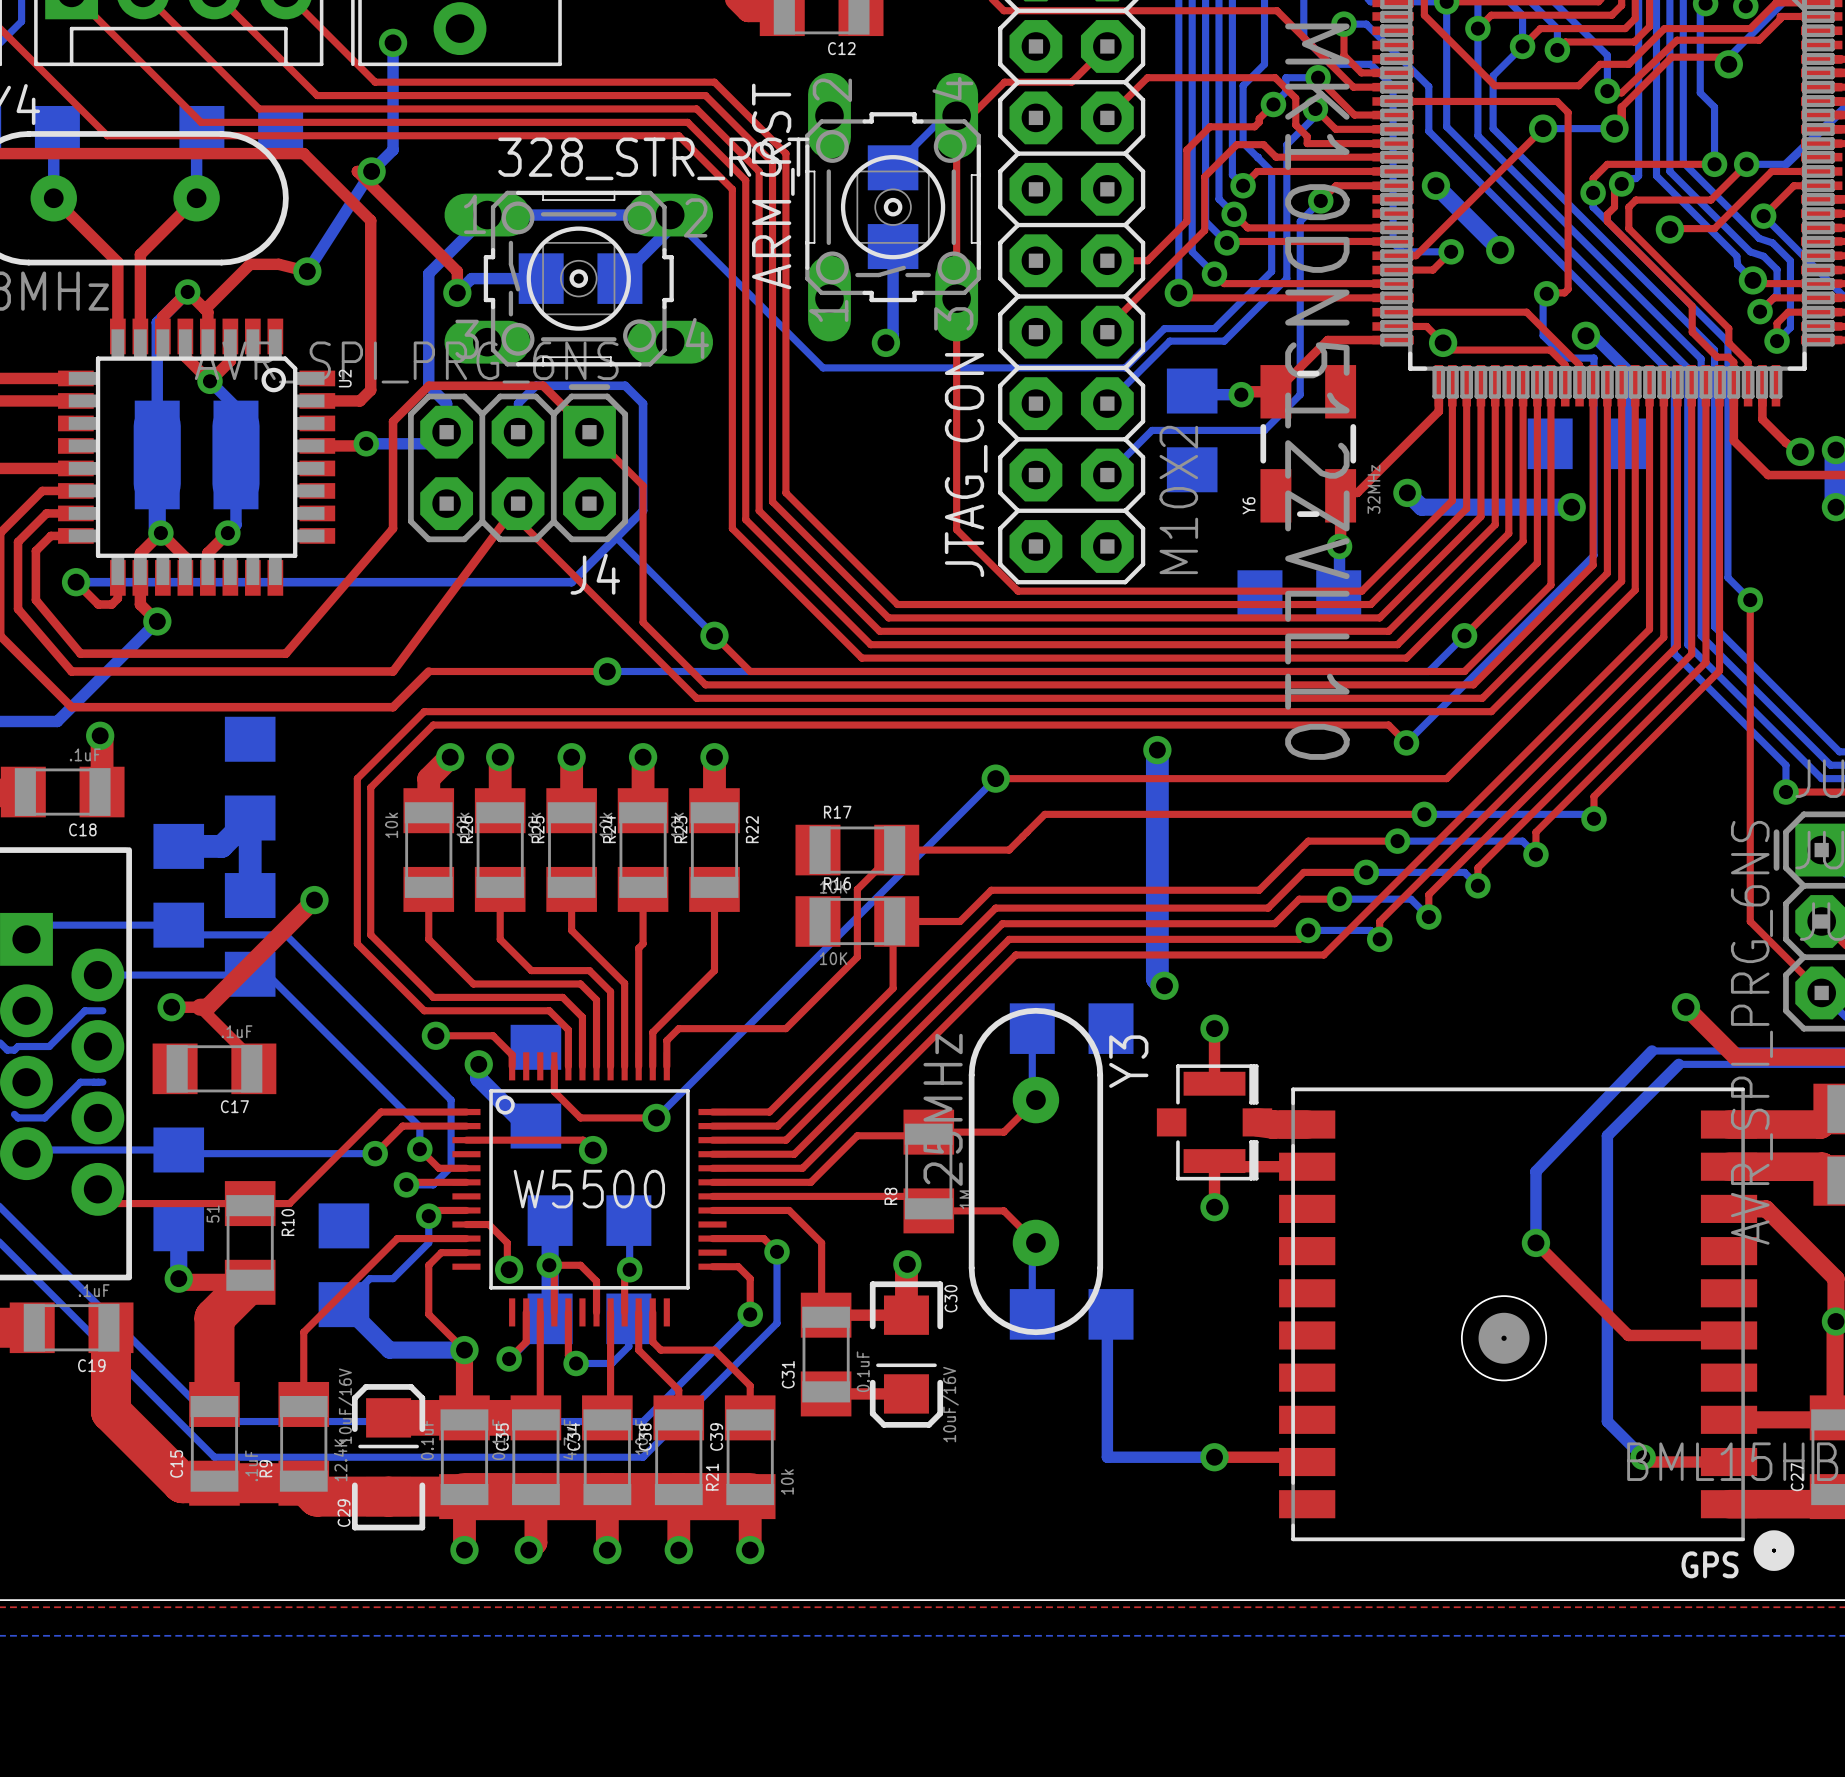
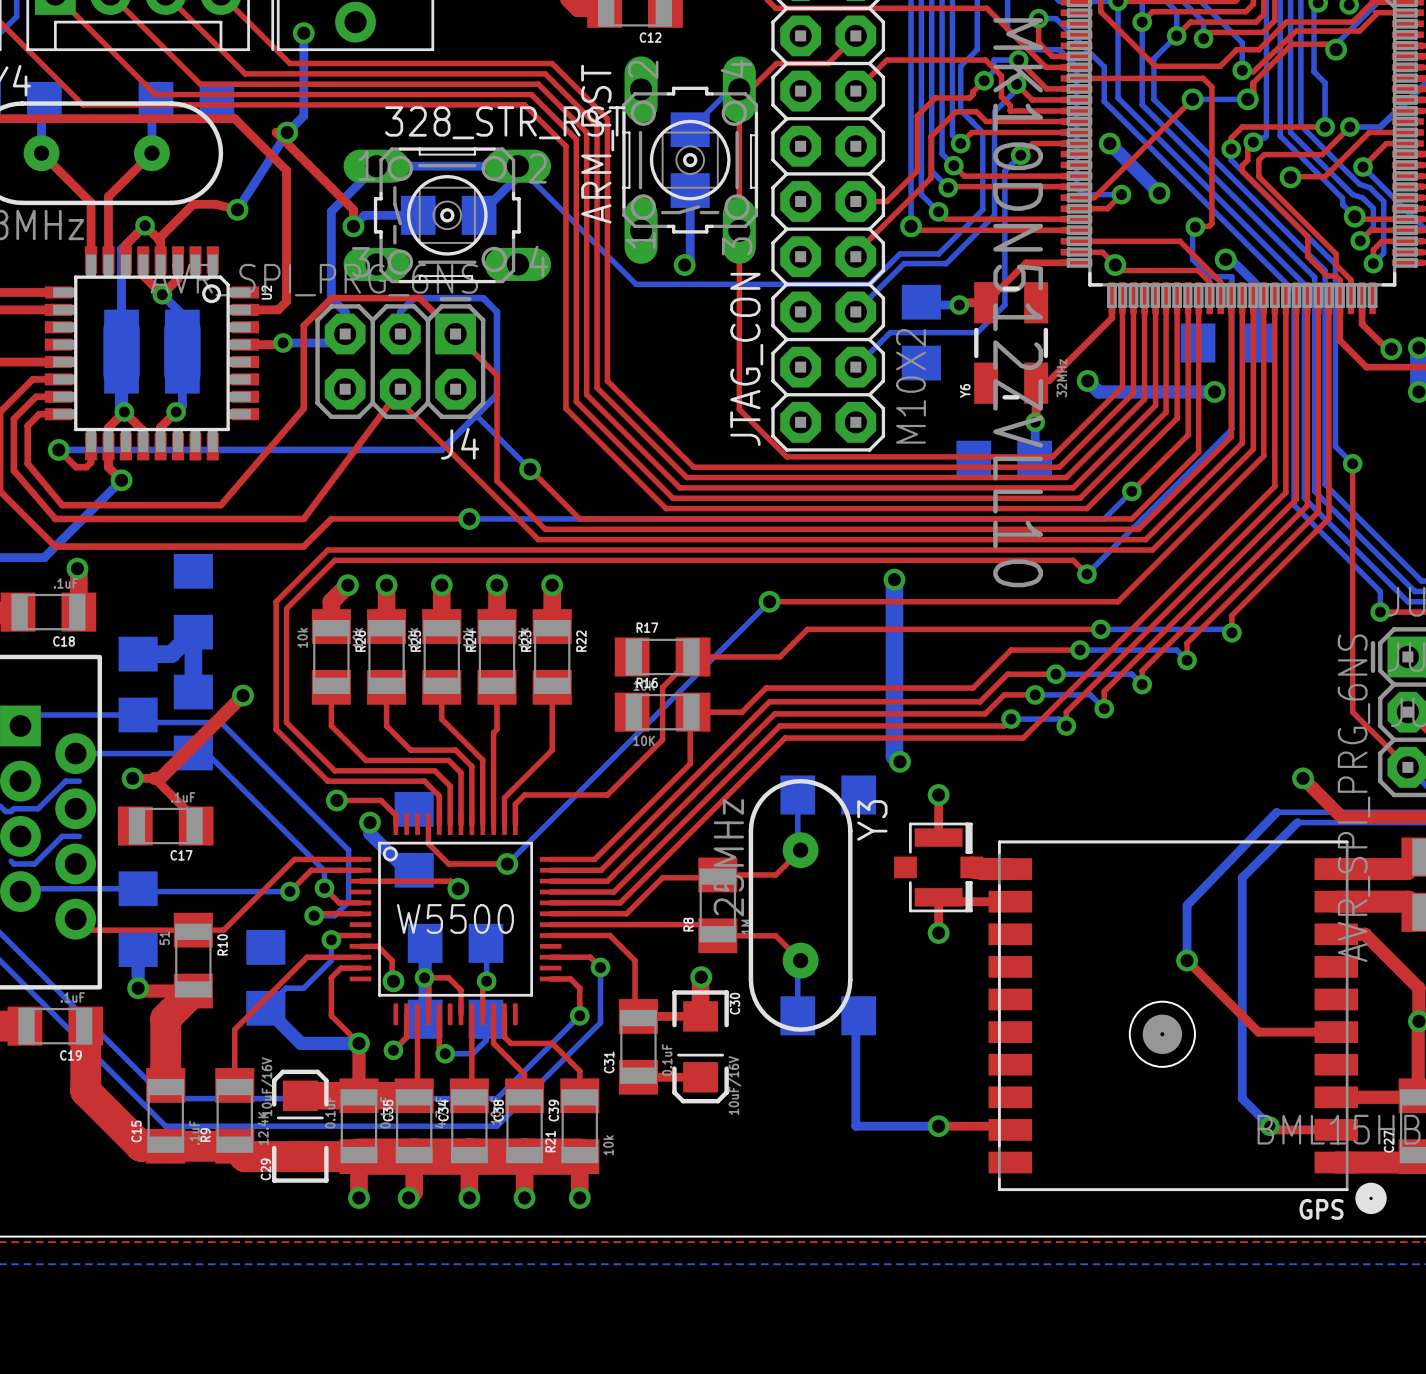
top track: none -> (530, 469) (552, 491)
bottom track: (685, 607) (714, 635) -> none
via position: (714, 635) -> (530, 469)

